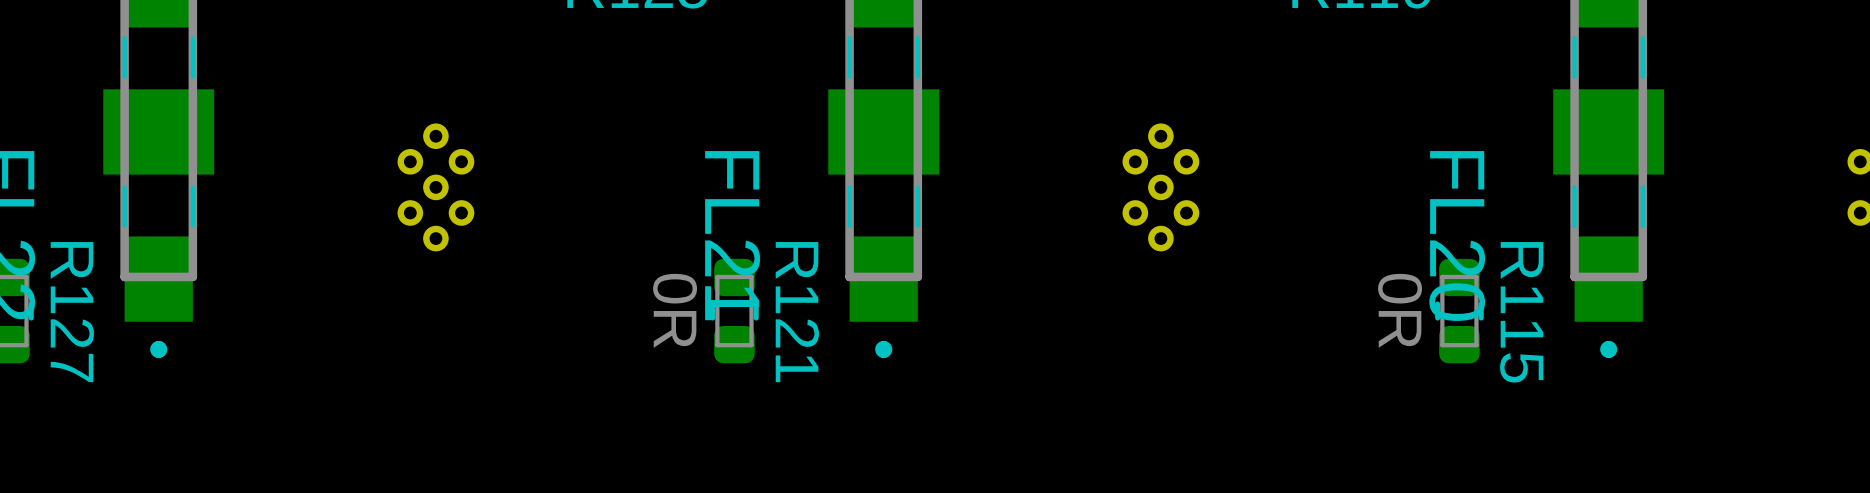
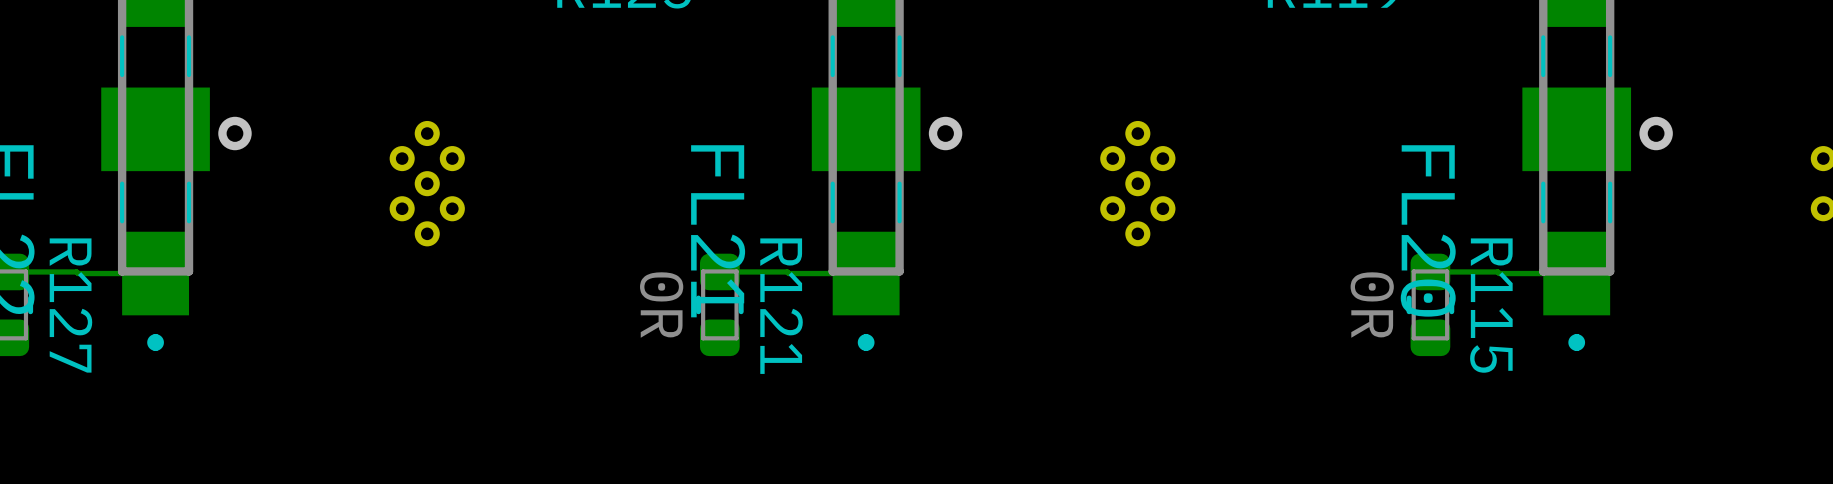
via: none -> (234, 133)
via: none -> (945, 133)
via: none -> (1656, 133)
track: none -> (9, 271) (155, 273)
track: none -> (719, 271) (866, 273)
track: none -> (1430, 271) (1576, 273)

